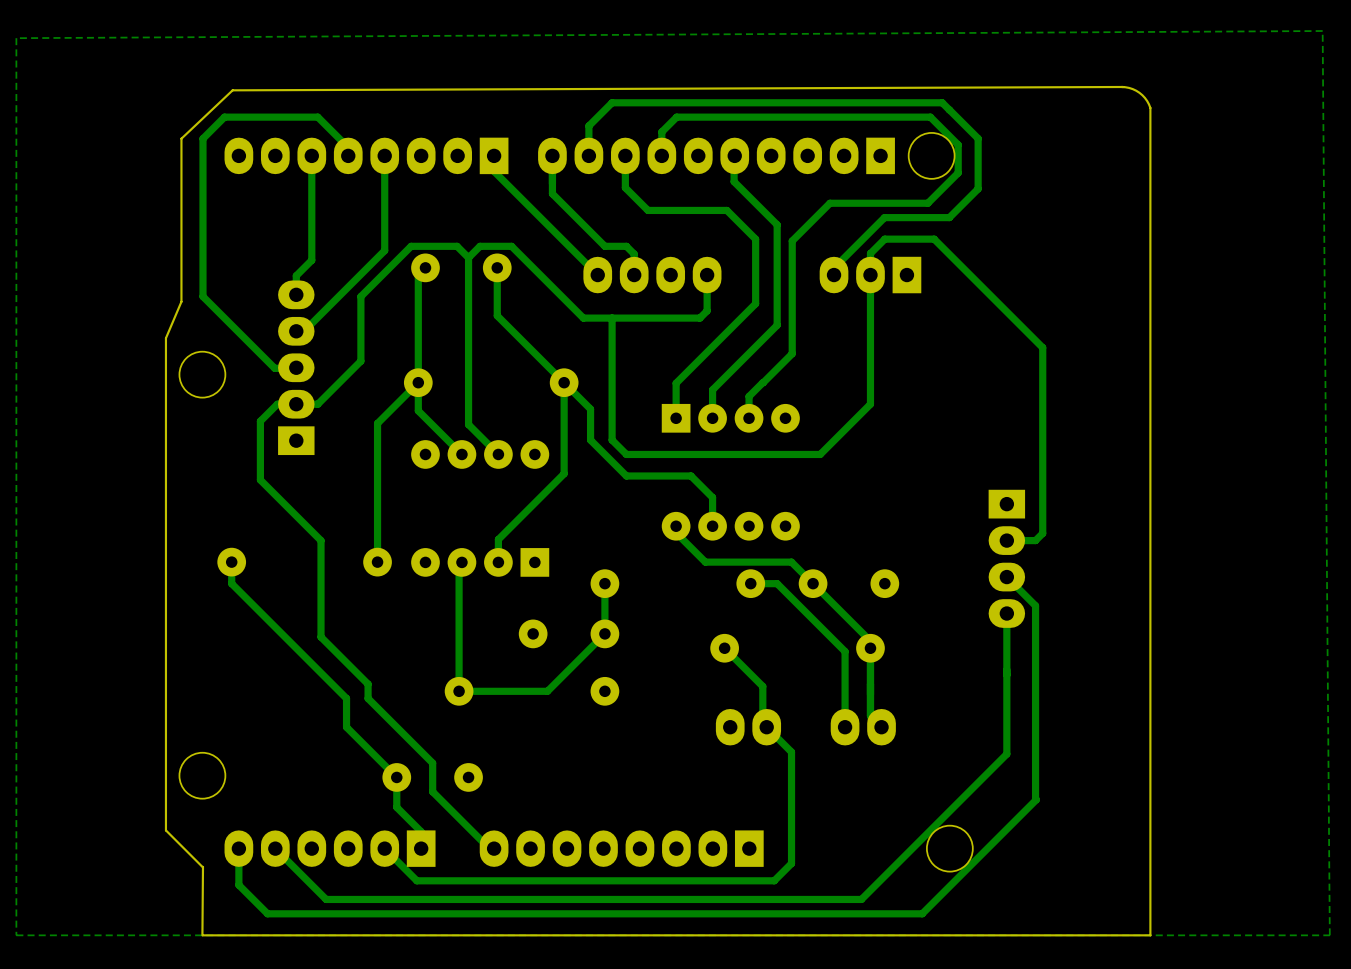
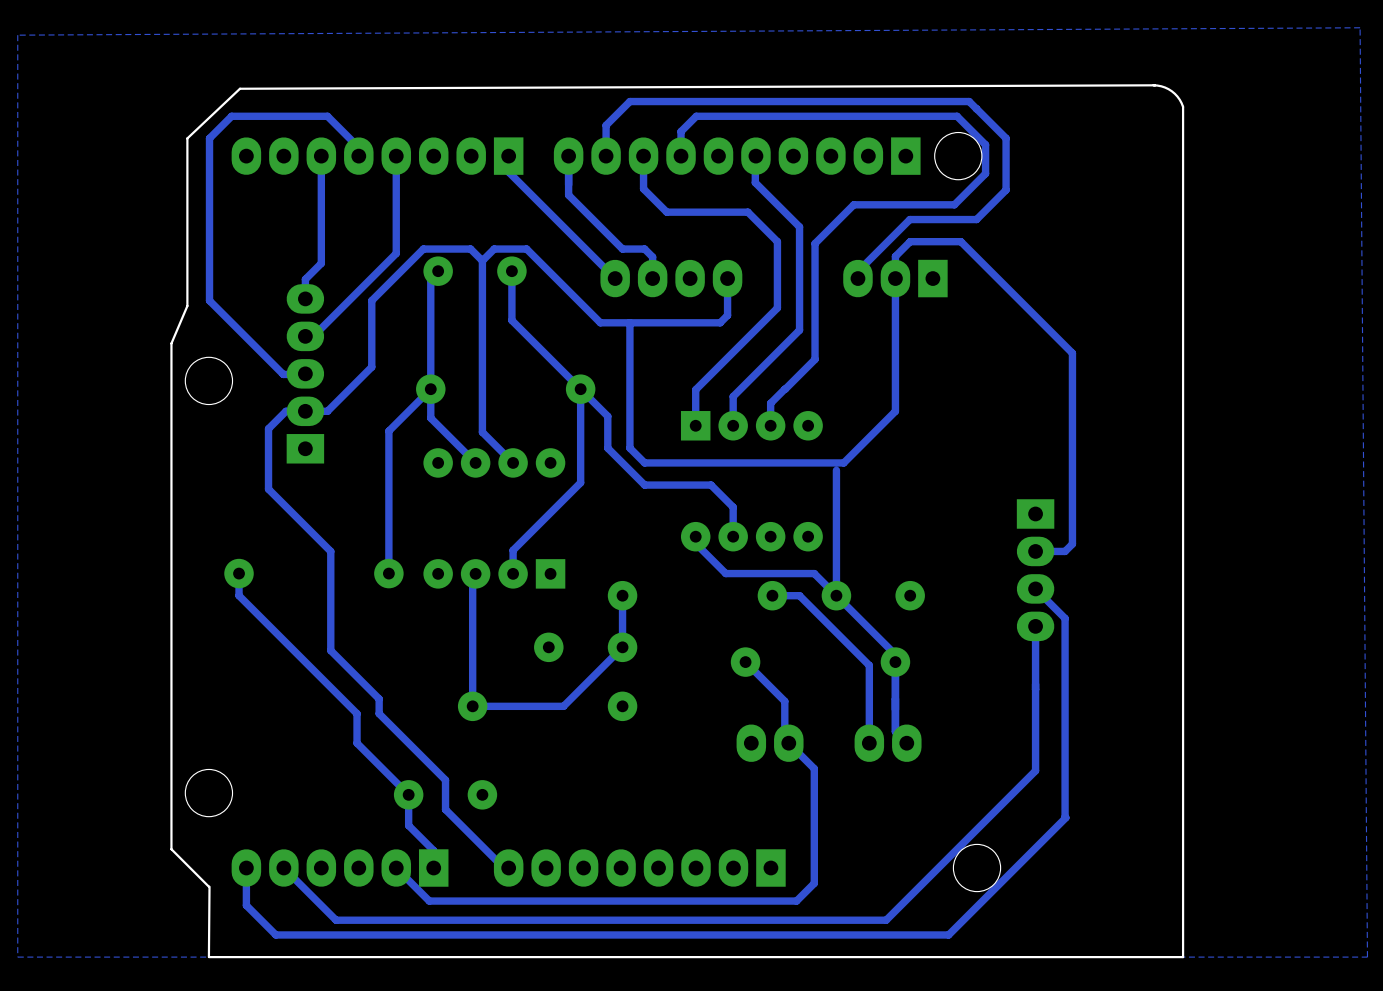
track: none -> (836, 470) (836, 595)

